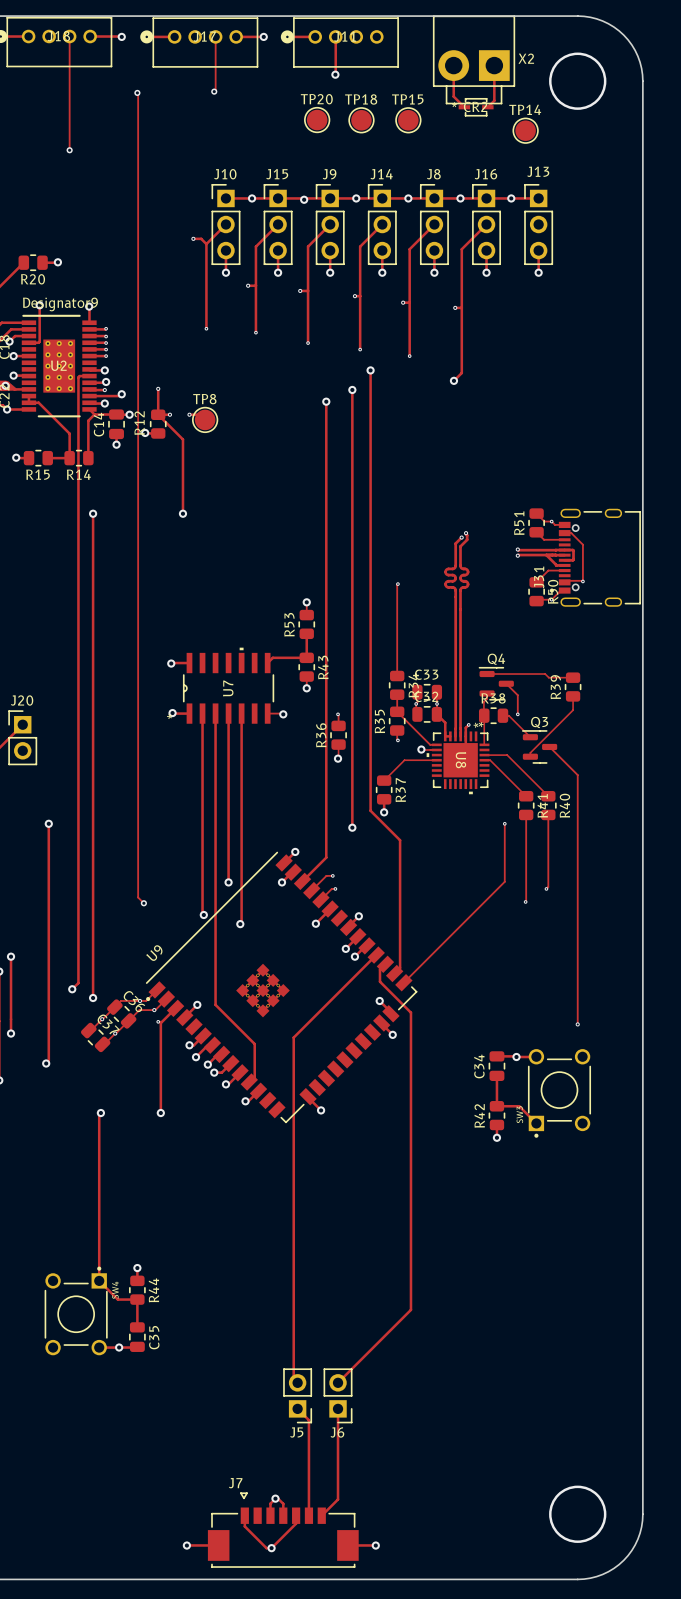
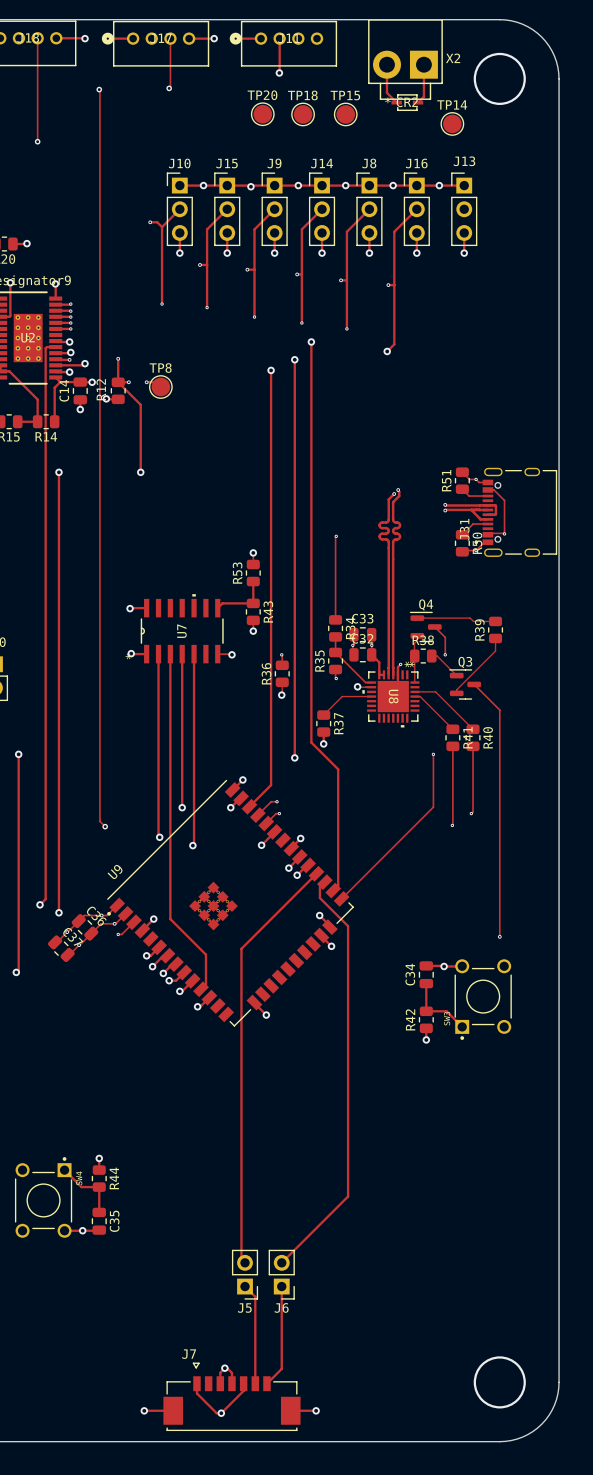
track: (175, 1008) (160, 1023) (160, 1113) -> none
track: (100, 1113) (99, 1114) (99, 1280) -> none
via: (100, 1113) -> none
via: (160, 1113) -> none

